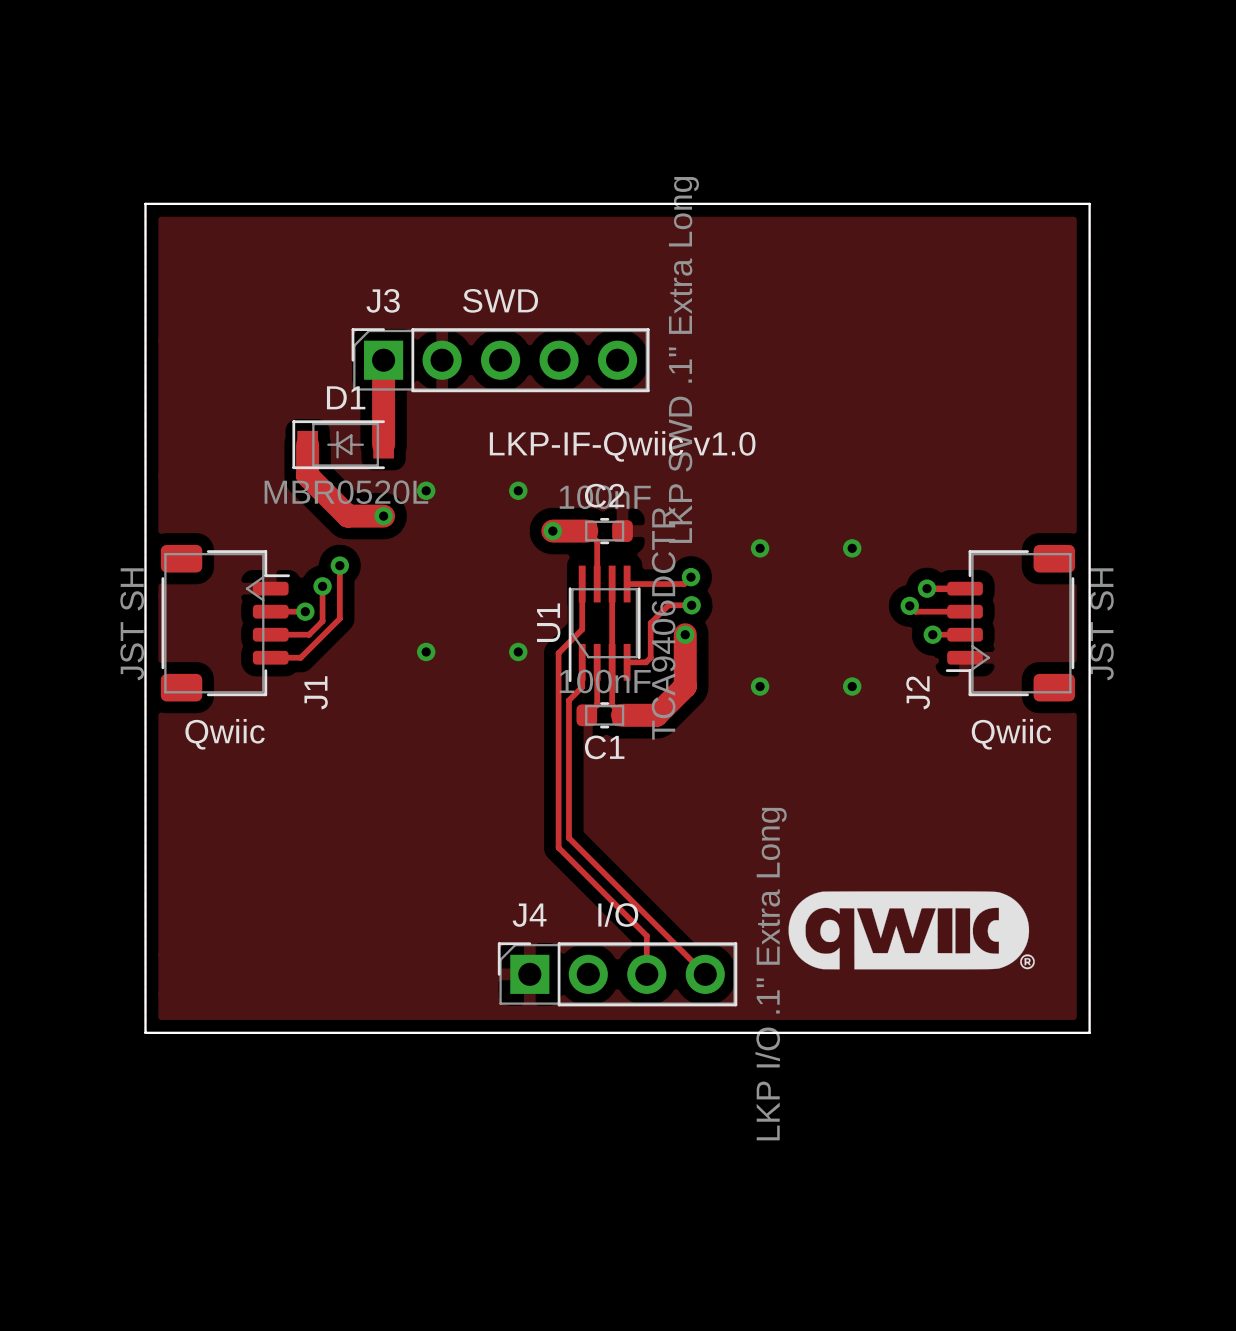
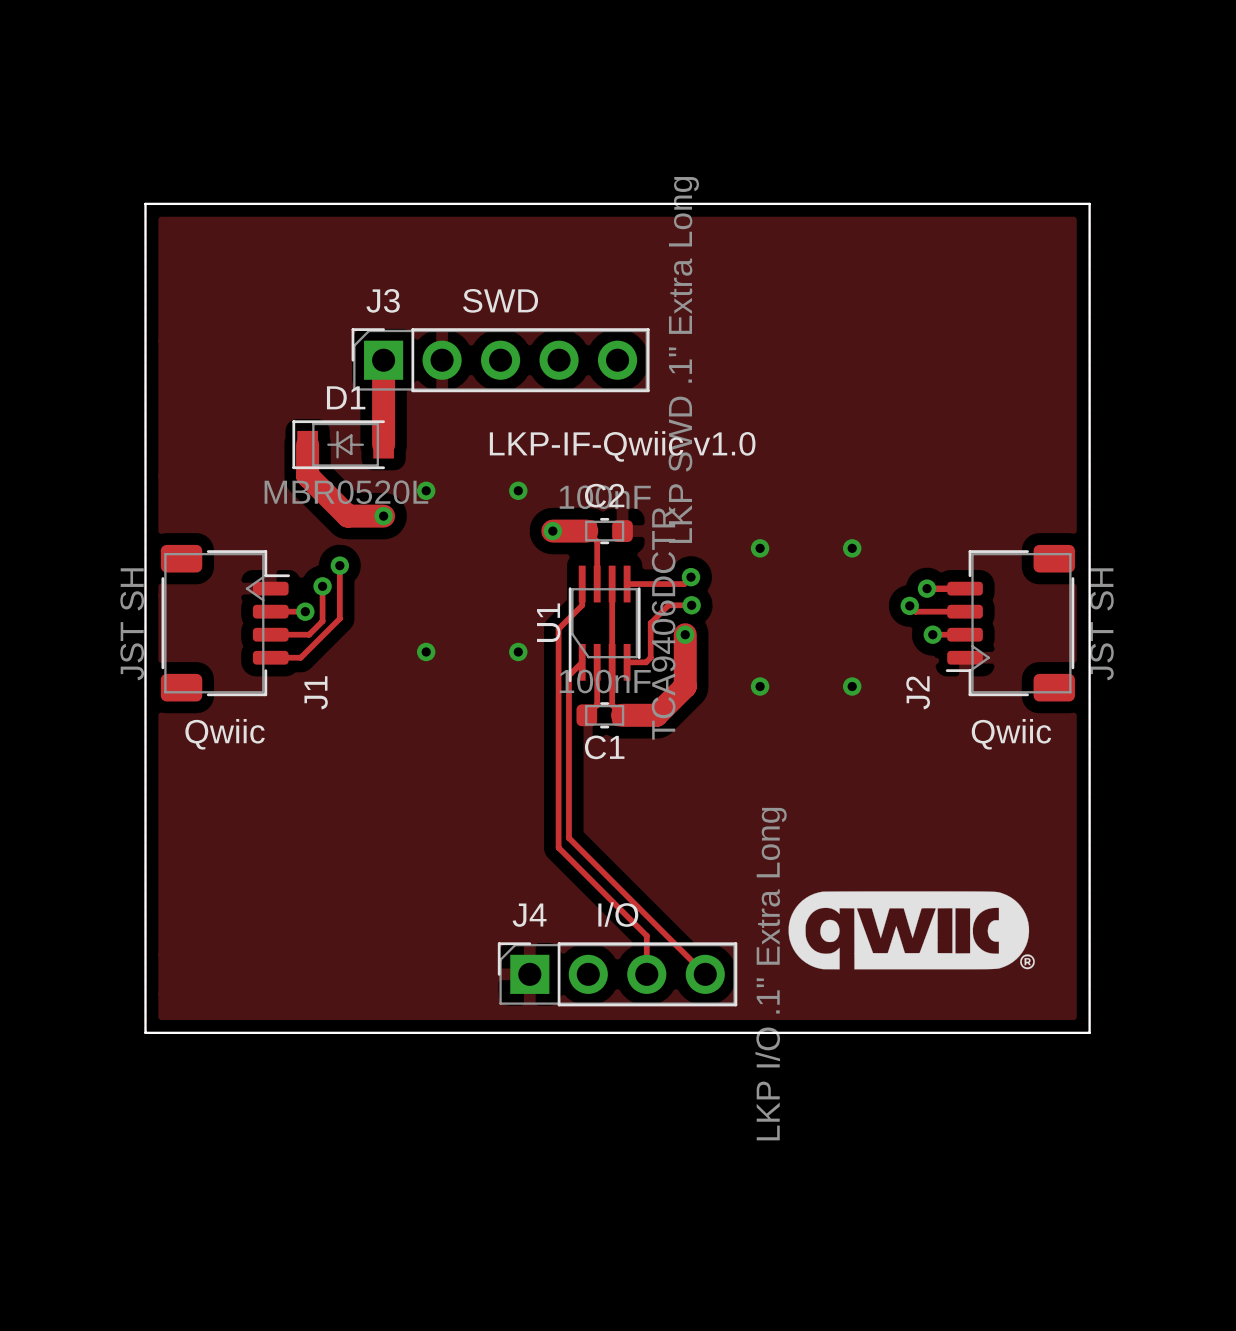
track: (582, 605) (582, 629) (558, 653) -> (582, 605) (558, 628) (558, 653)
track: (582, 662) (582, 687) (568, 700) -> (582, 662) (568, 675) (568, 700)

